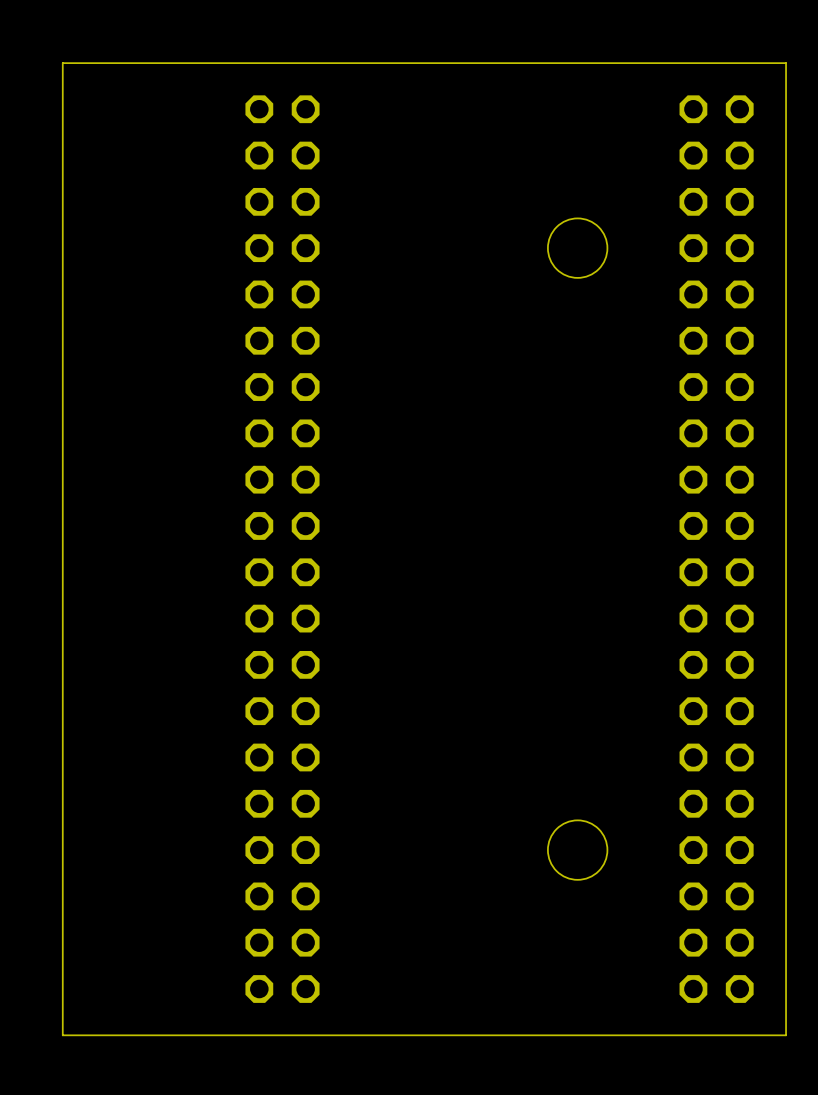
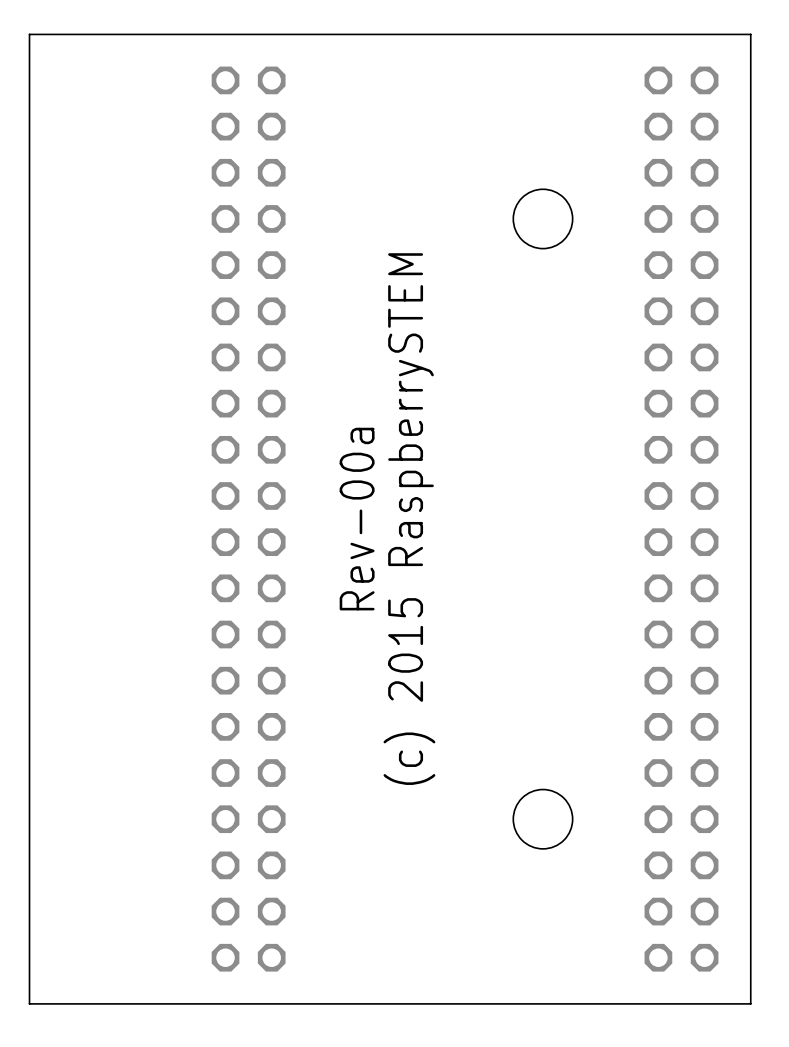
text: none -> Rev-00a (357, 519)
text: none -> (c) 2015 RaspberrySTEM (409, 519)

